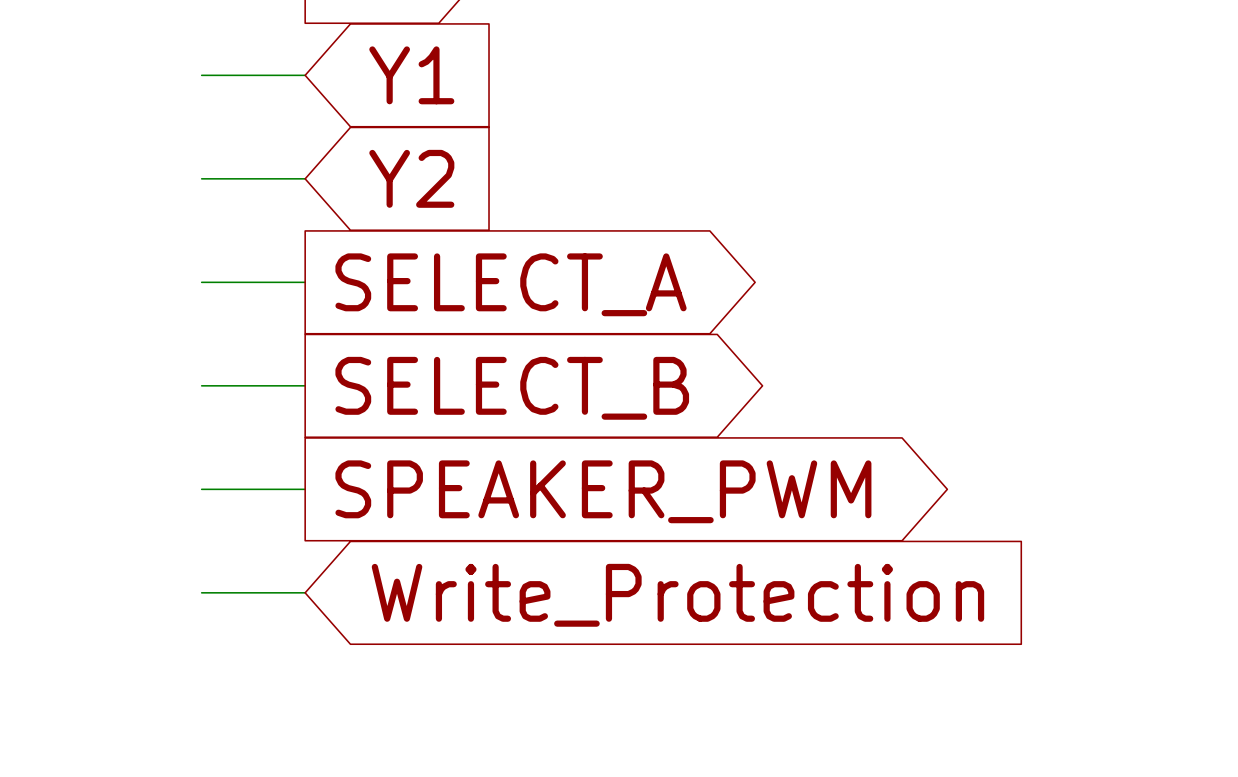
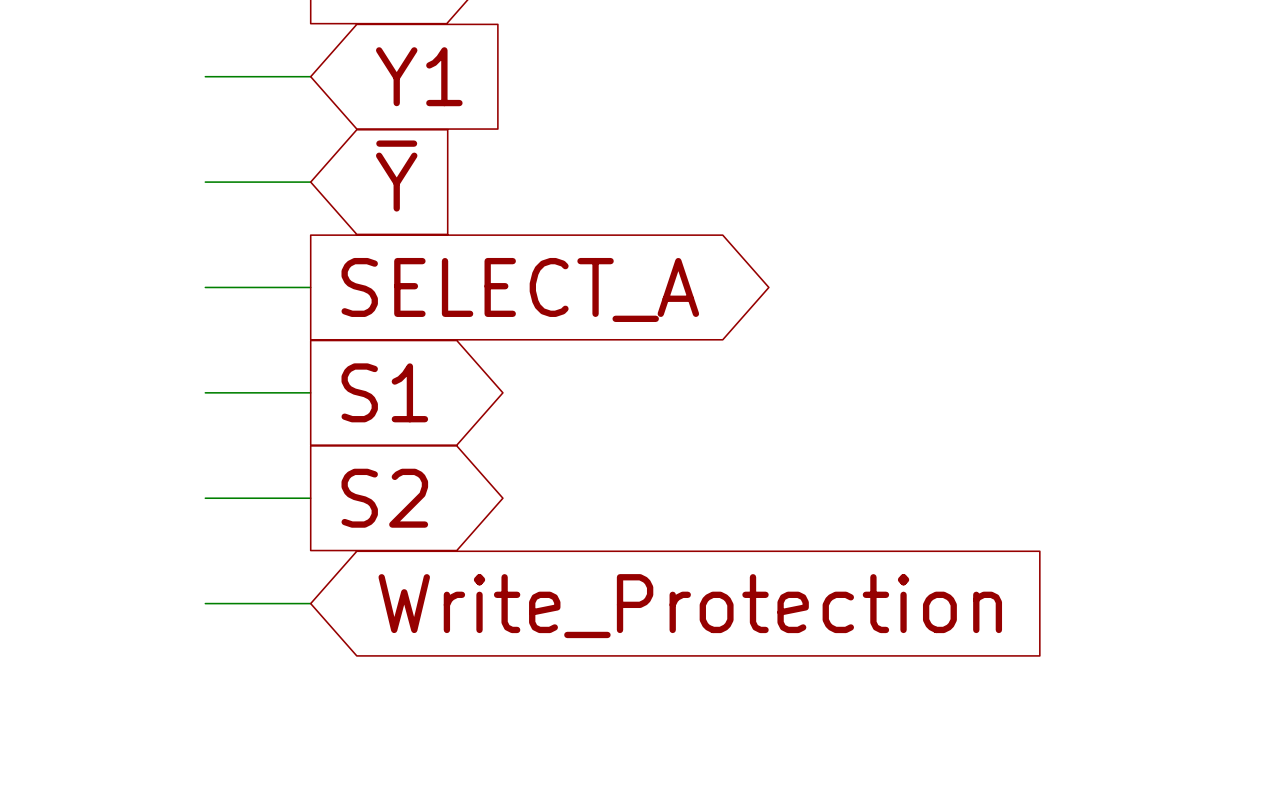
global label: Y2 (411, 178) -> ~{Y} (396, 176)
global label: SELECT_B (512, 388) -> S1 (384, 392)
global label: SPEAKER_PWM (603, 491) -> S2 (384, 498)

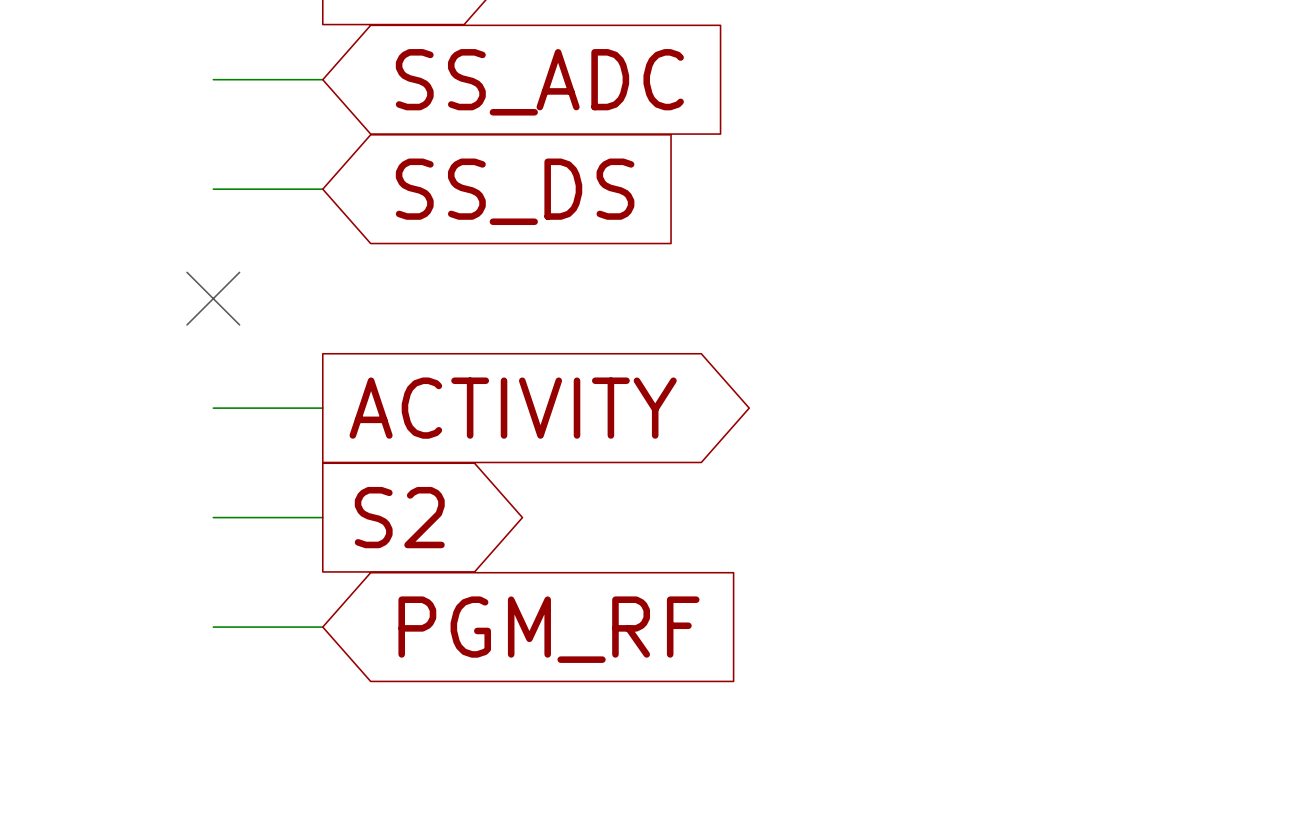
global label: Y1 (419, 76) -> SS_ADC (539, 82)
global label: ~{Y} (396, 176) -> SS_DS (515, 191)
wire: (205, 287) (310, 287) -> none
no-connect mark: none -> (213, 298)
global label: SELECT_A (520, 289) -> none
global label: S1 (384, 392) -> ACTIVITY (513, 408)
global label: Write_Protection (690, 606) -> PGM_RF (548, 629)

